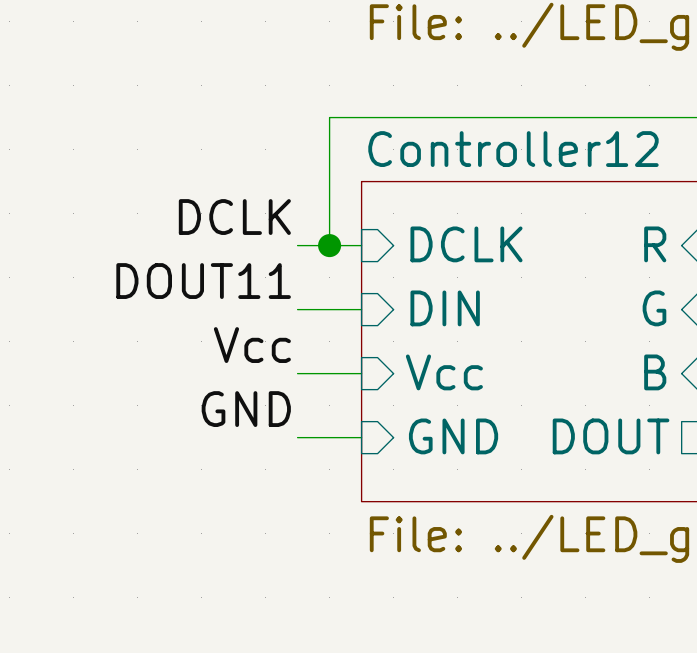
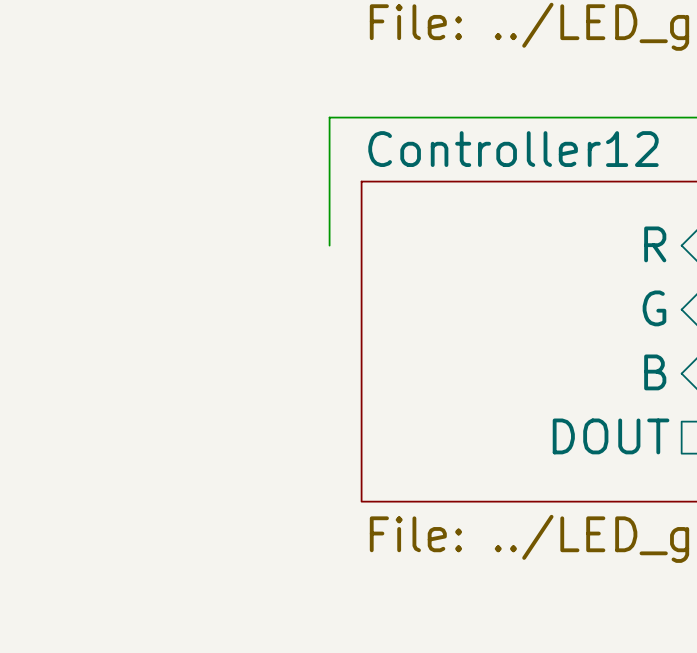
label: DCLK (234, 217) -> none
sheet pin: DCLK (466, 244) -> none
wire: (297, 245) (361, 245) -> none
junction: (329, 245) -> none
label: DOUT11 (203, 281) -> none
sheet pin: DIN (445, 308) -> none
wire: (297, 309) (361, 309) -> none
label: Vcc (252, 345) -> none
sheet pin: Vcc (444, 372) -> none
wire: (297, 373) (361, 373) -> none
label: GND (246, 409) -> none
sheet pin: GND (453, 436) -> none
wire: (297, 437) (361, 437) -> none

